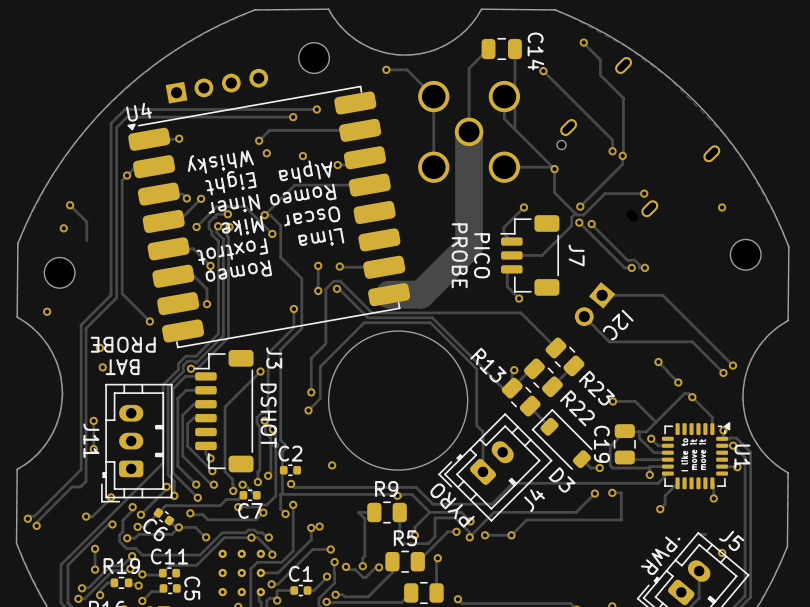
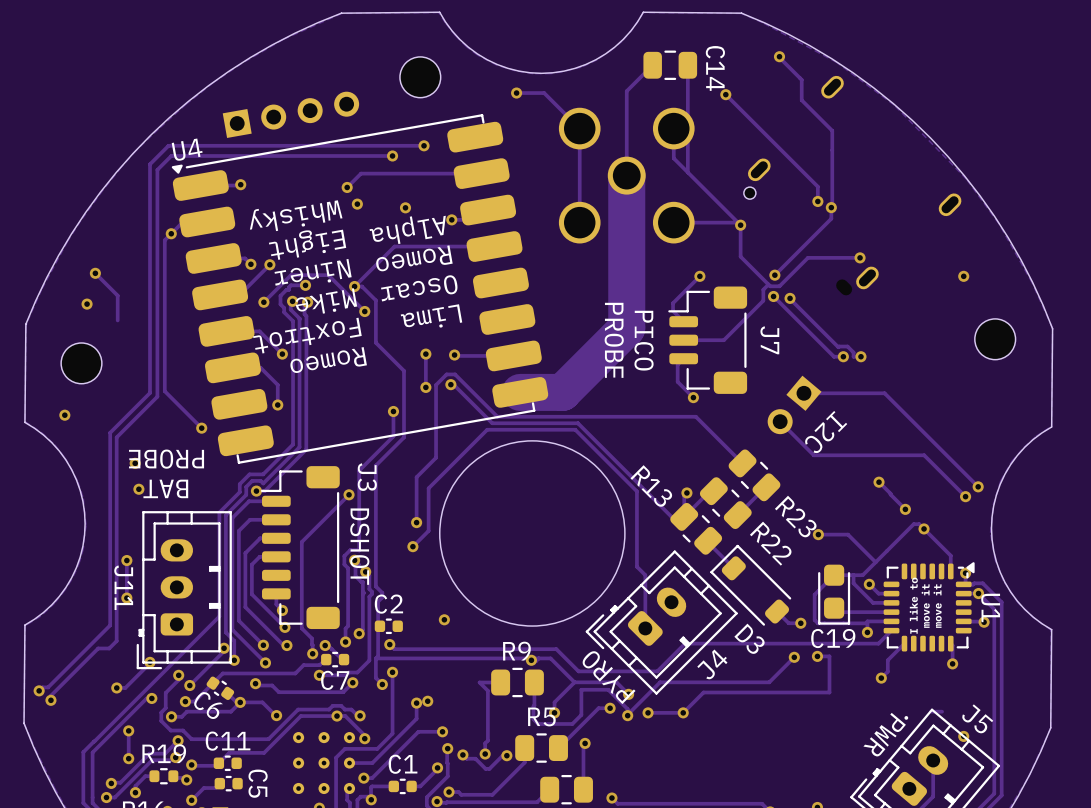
C19 footprint: [613, 424, 636, 465] -> [818, 564, 851, 625]
C19 name position: C19 (601, 444) -> C19 (833, 638)

